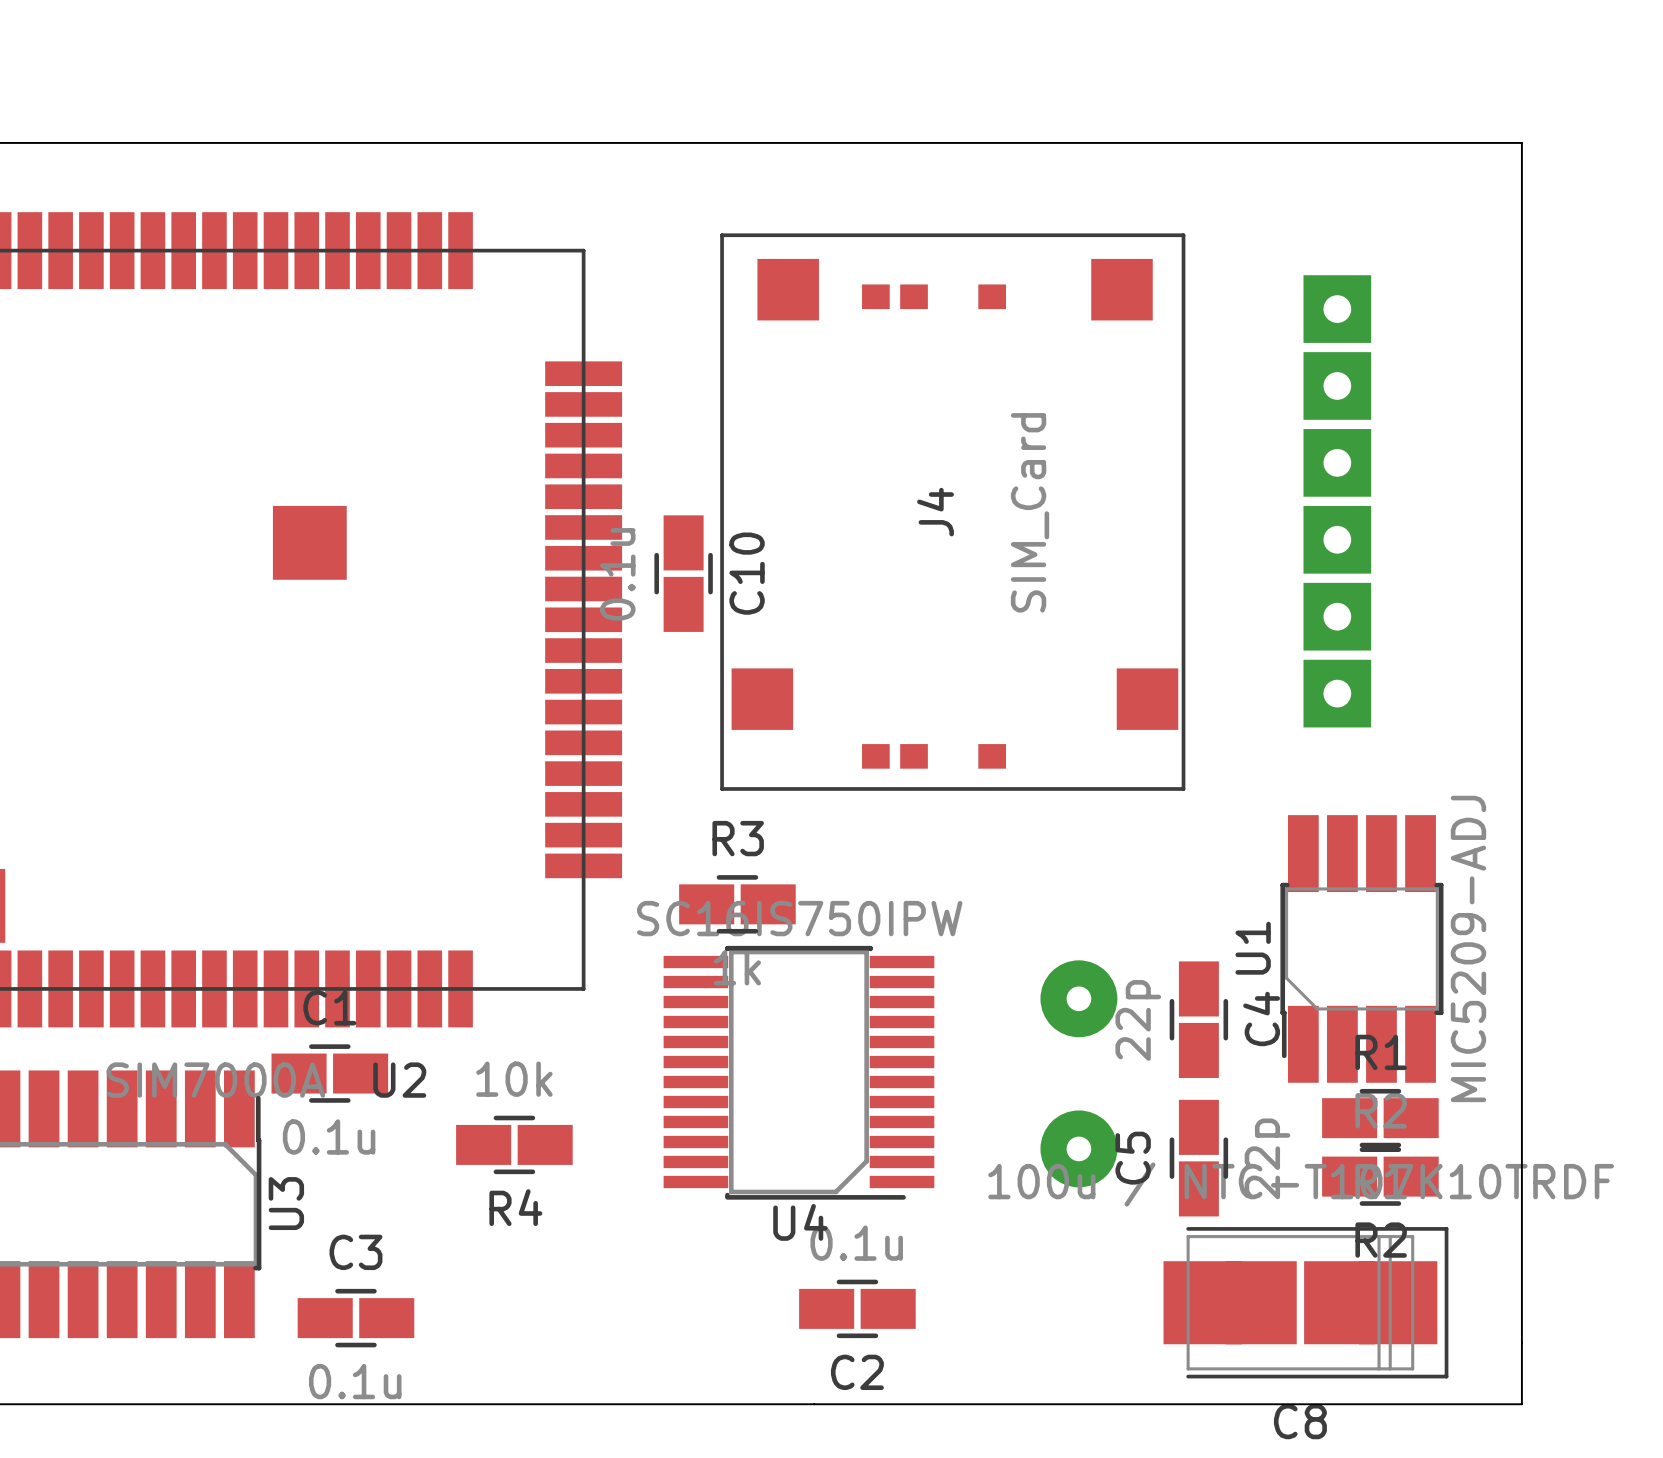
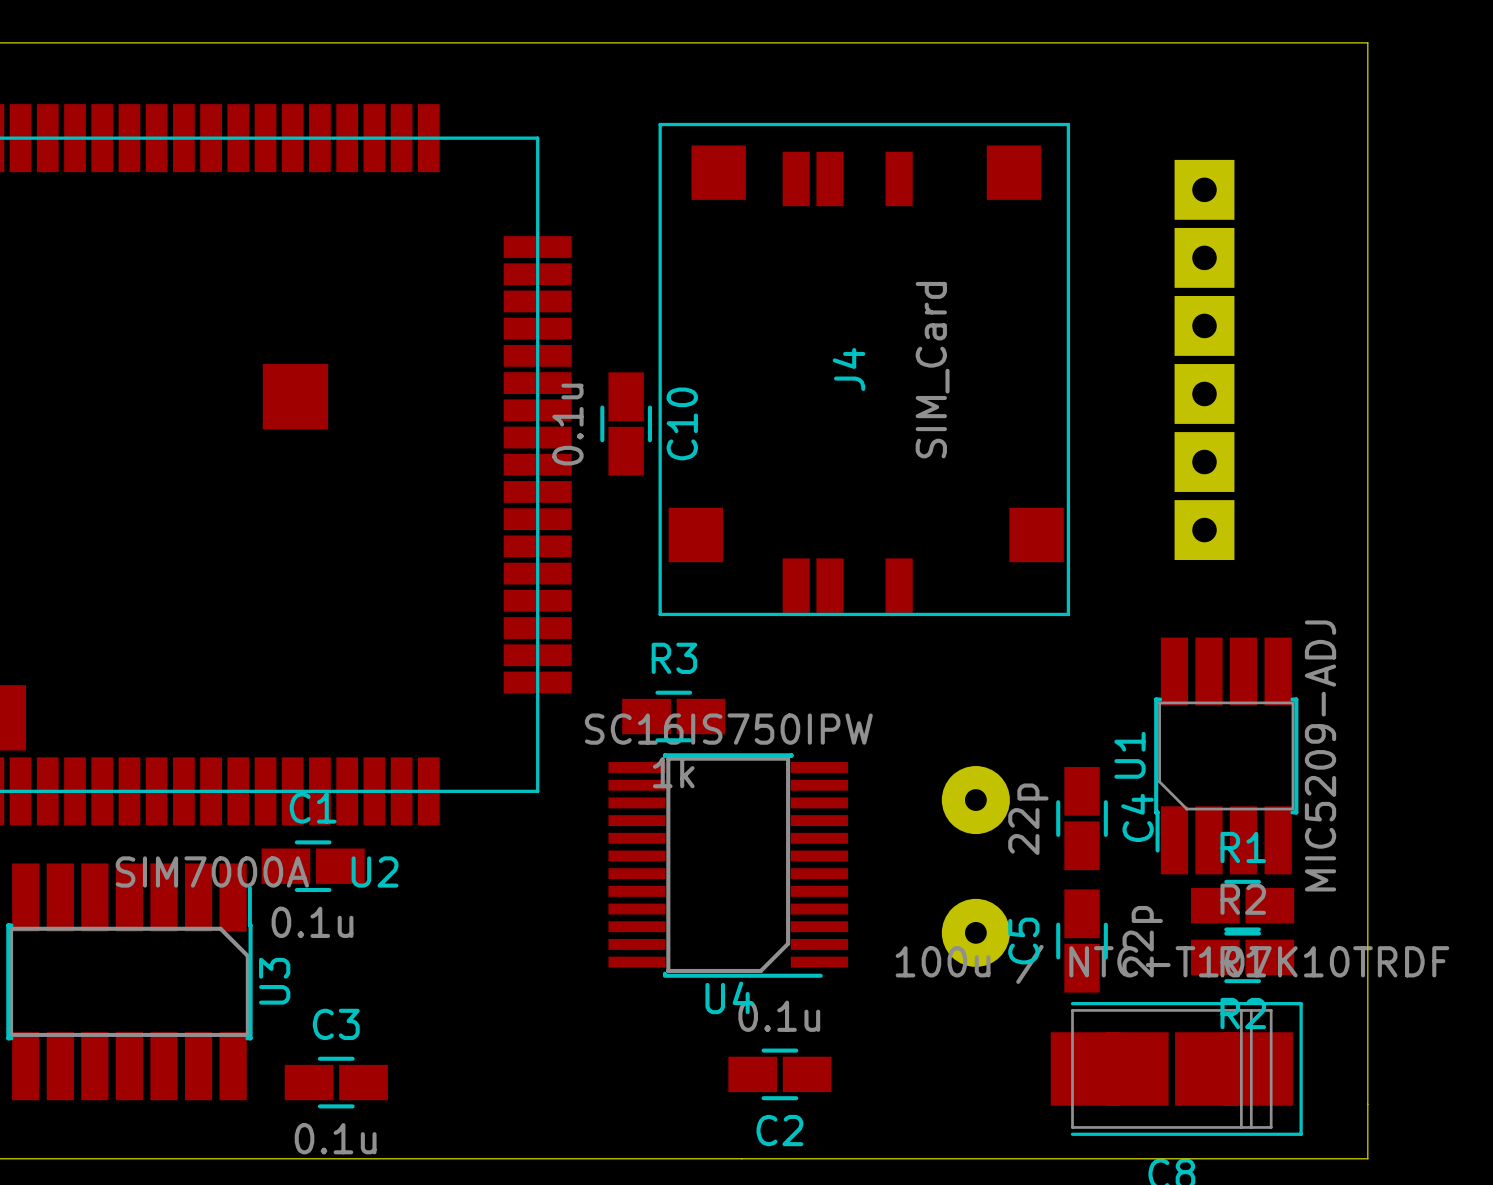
J4 footprint: [720, 233, 1186, 791] -> [658, 122, 1071, 617]
R4: 10k (514, 1144) -> none

